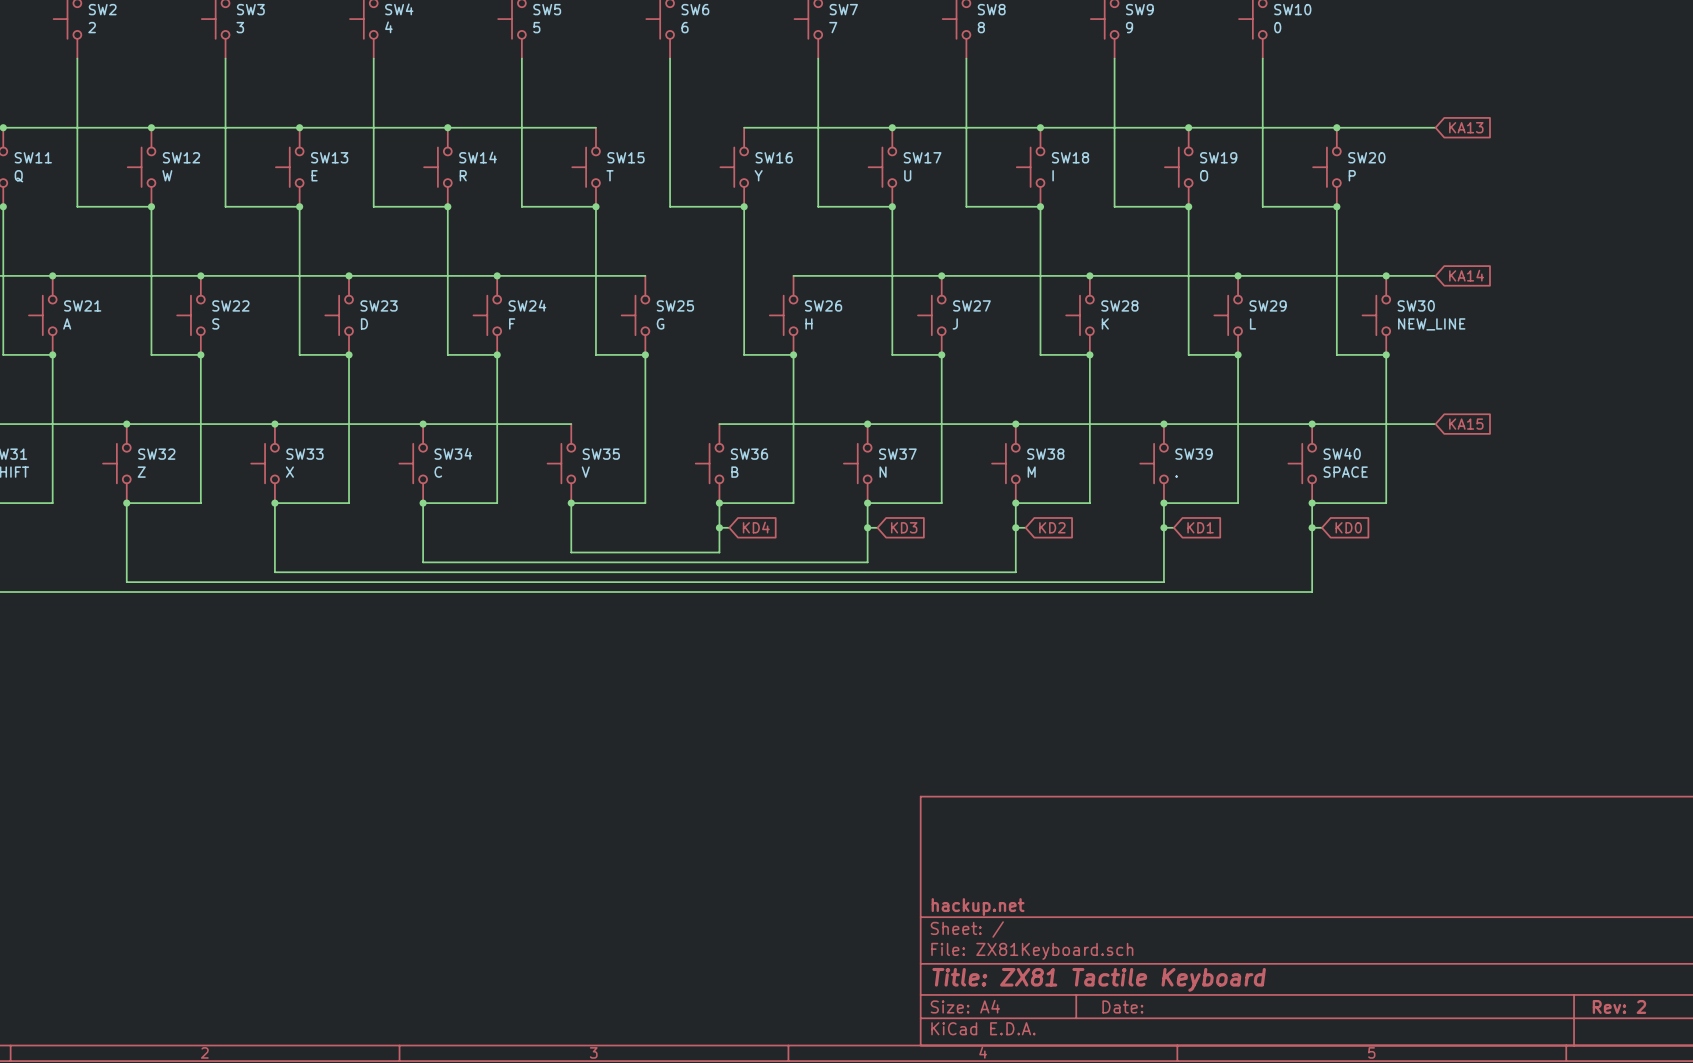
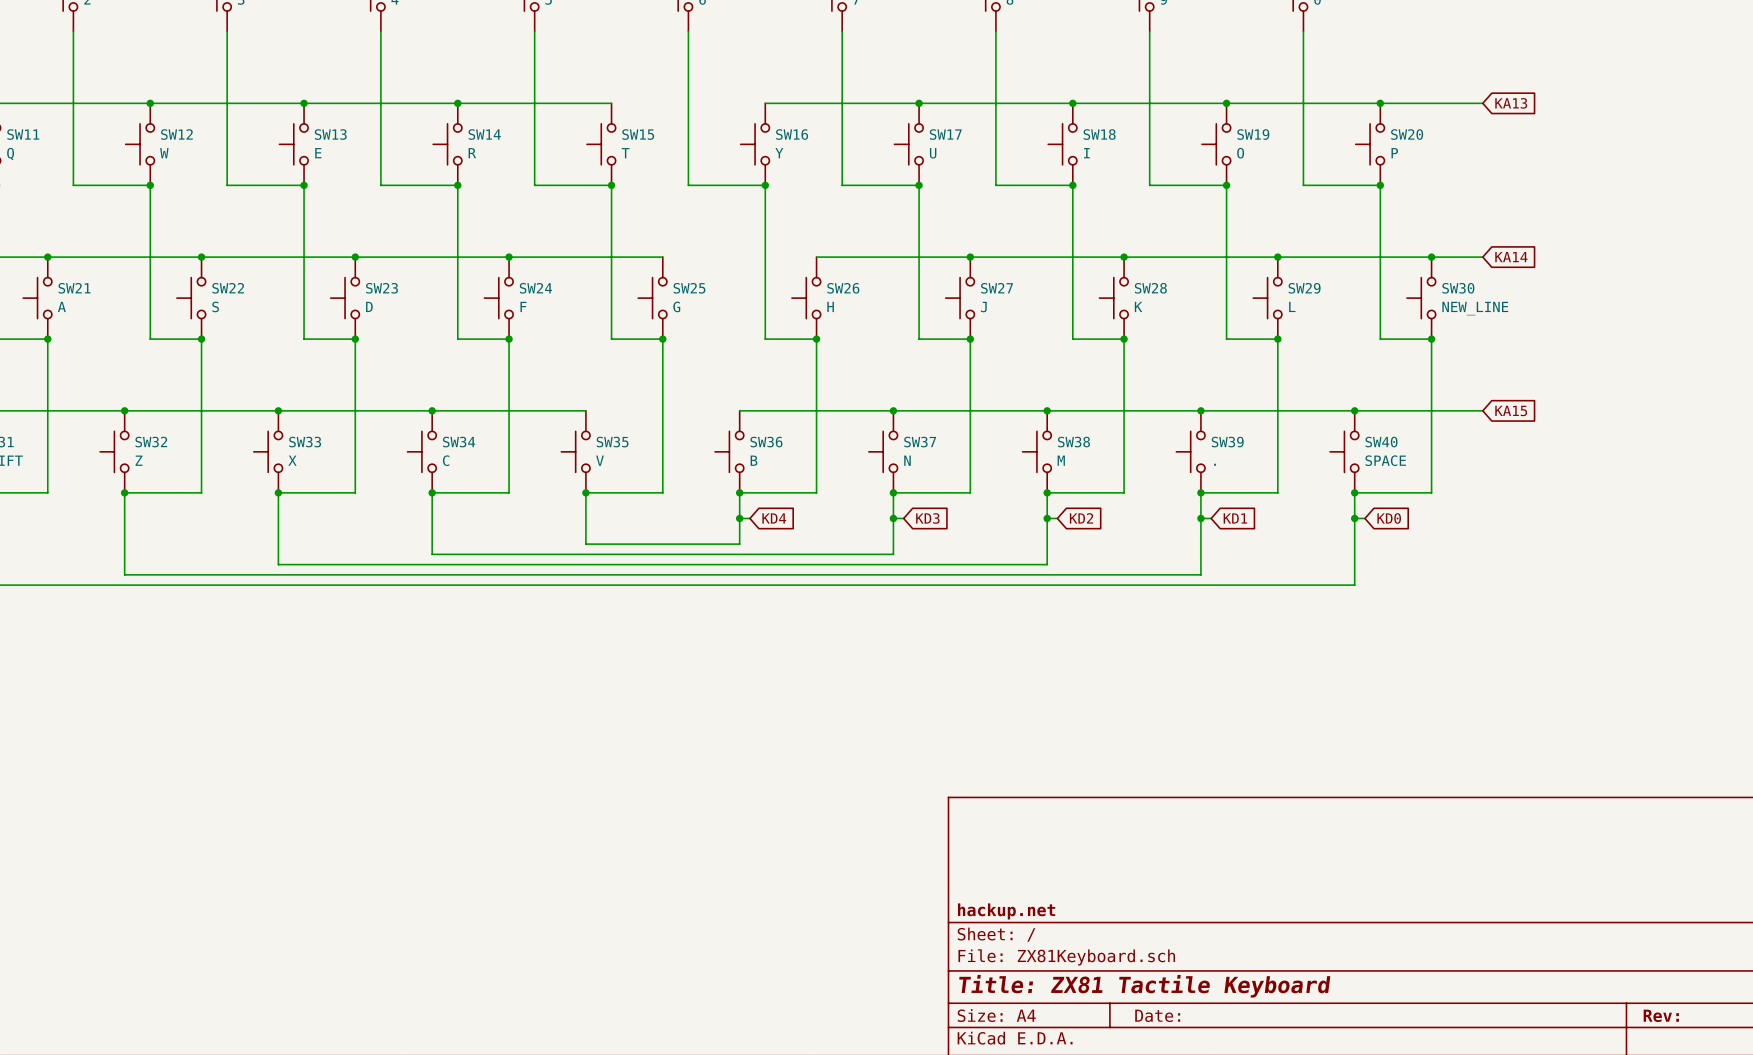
title block: Rev: 2 (1619, 1006) -> Rev: (1661, 1015)

